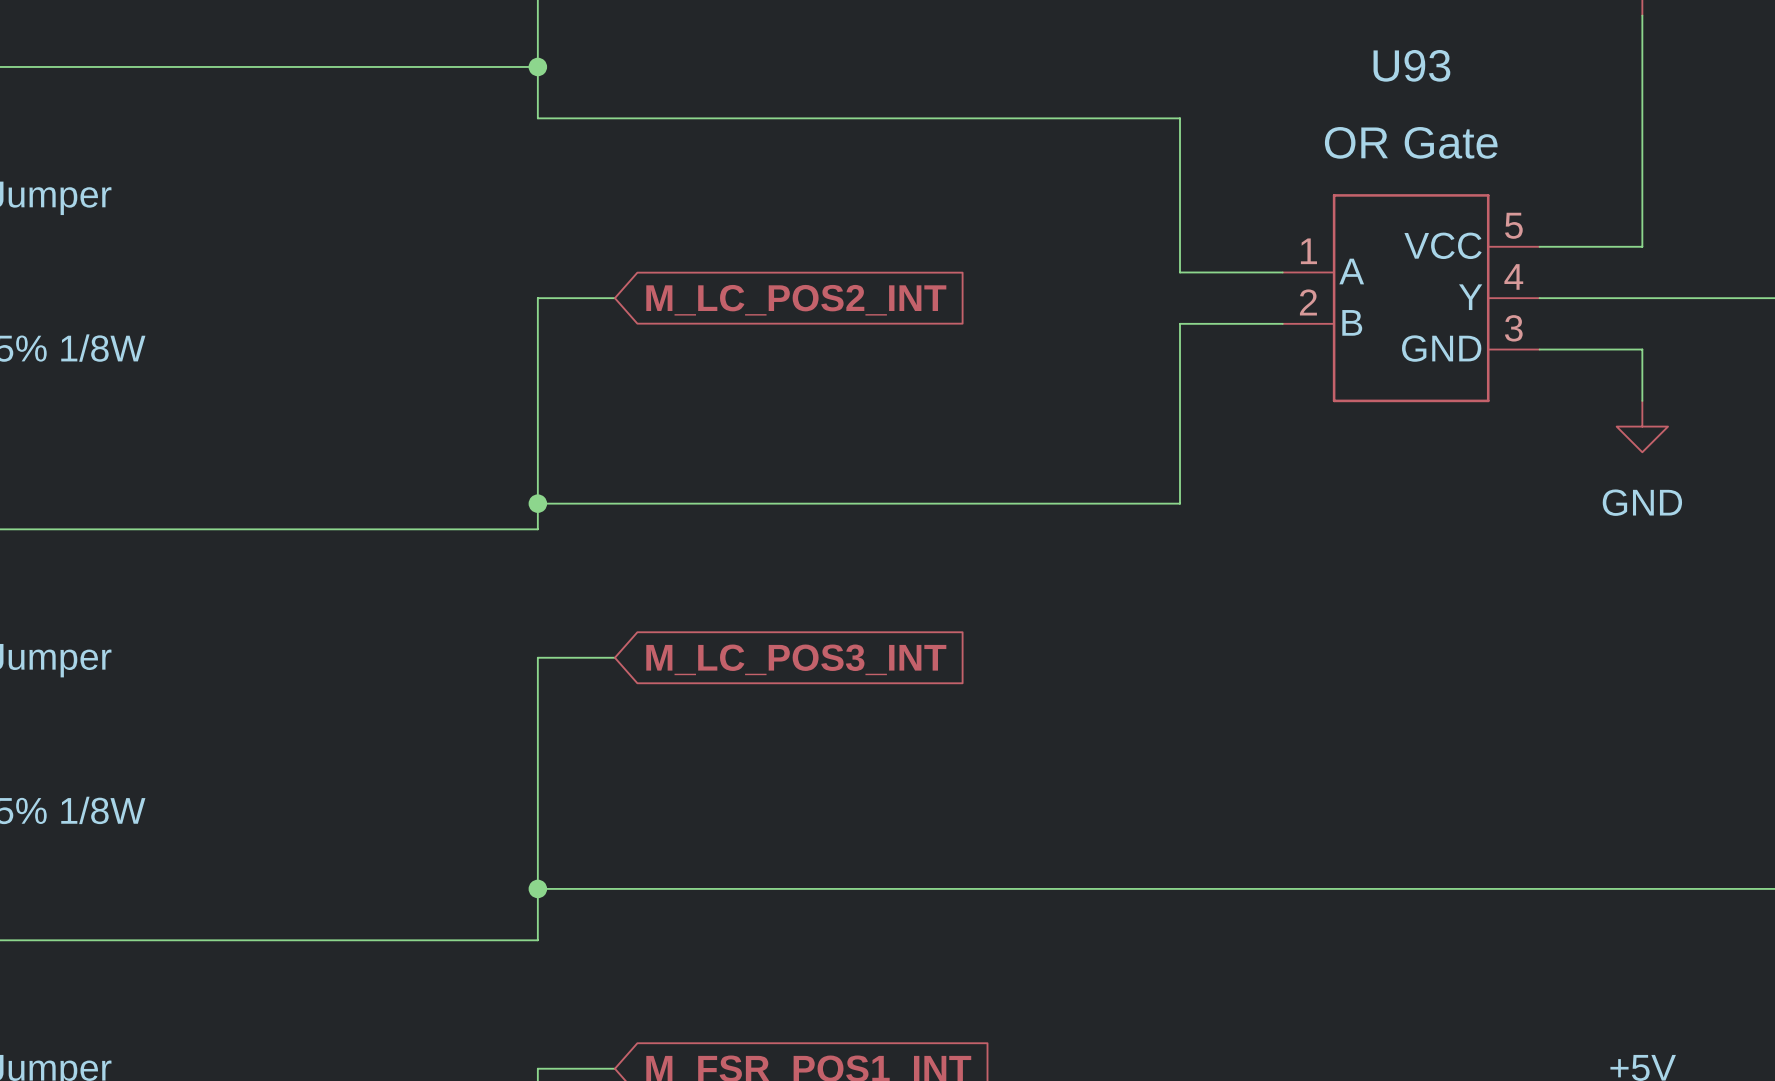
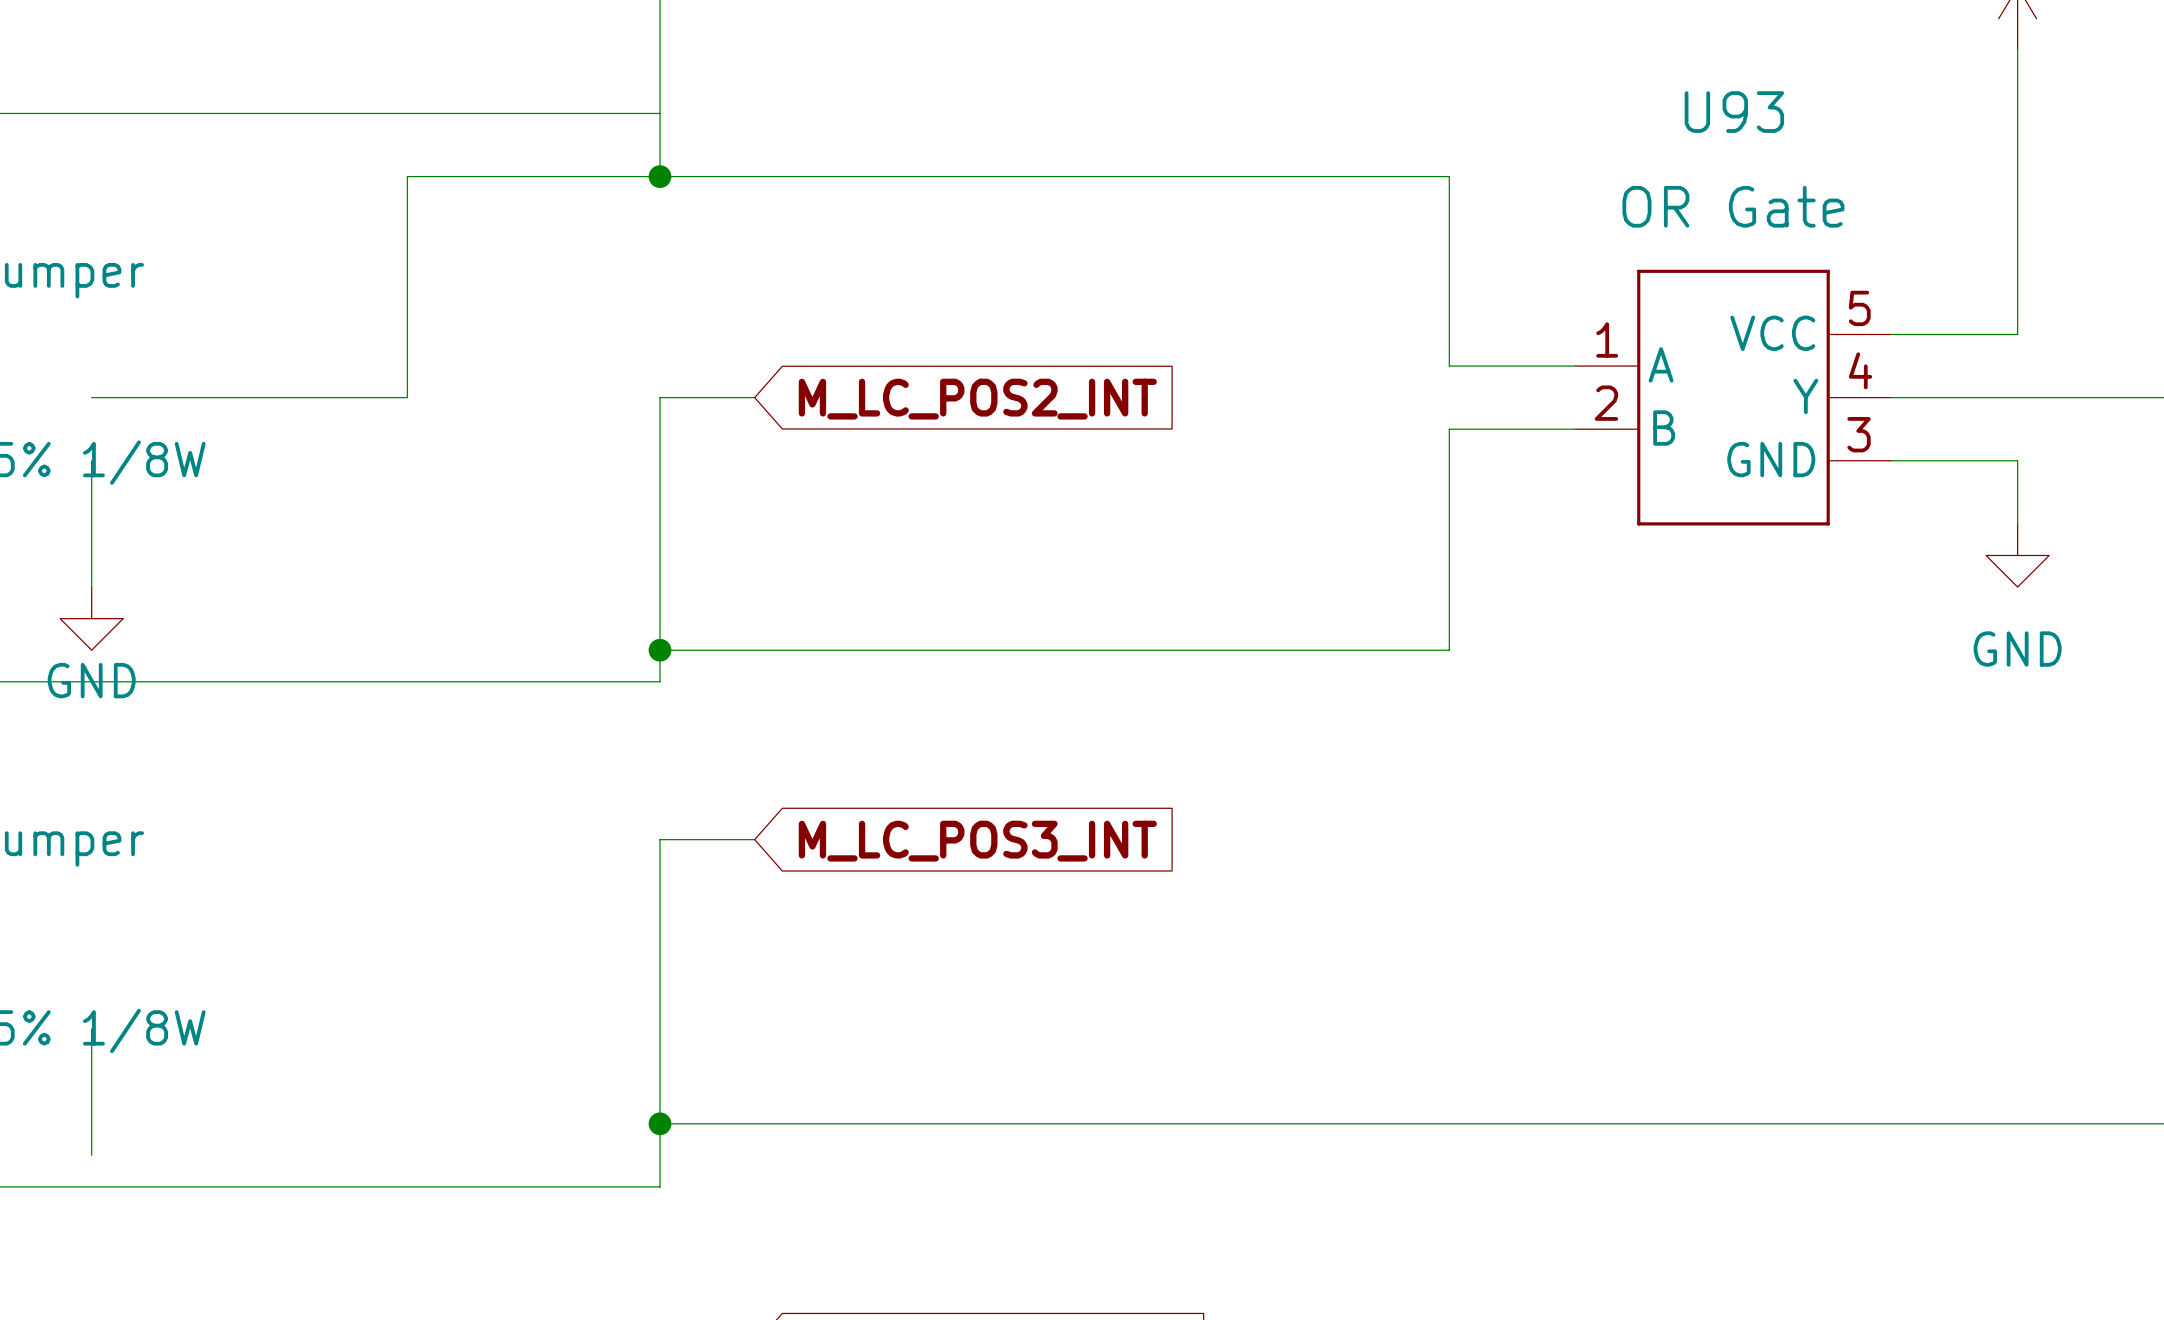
junction position: (537, 66) -> (659, 176)
wire: none -> (659, 176) (407, 176) (407, 397) (91, 397)
wire: none -> (91, 460) (91, 587)
power symbol: none -> GND (91, 618)
wire: none -> (91, 1029) (91, 1155)

